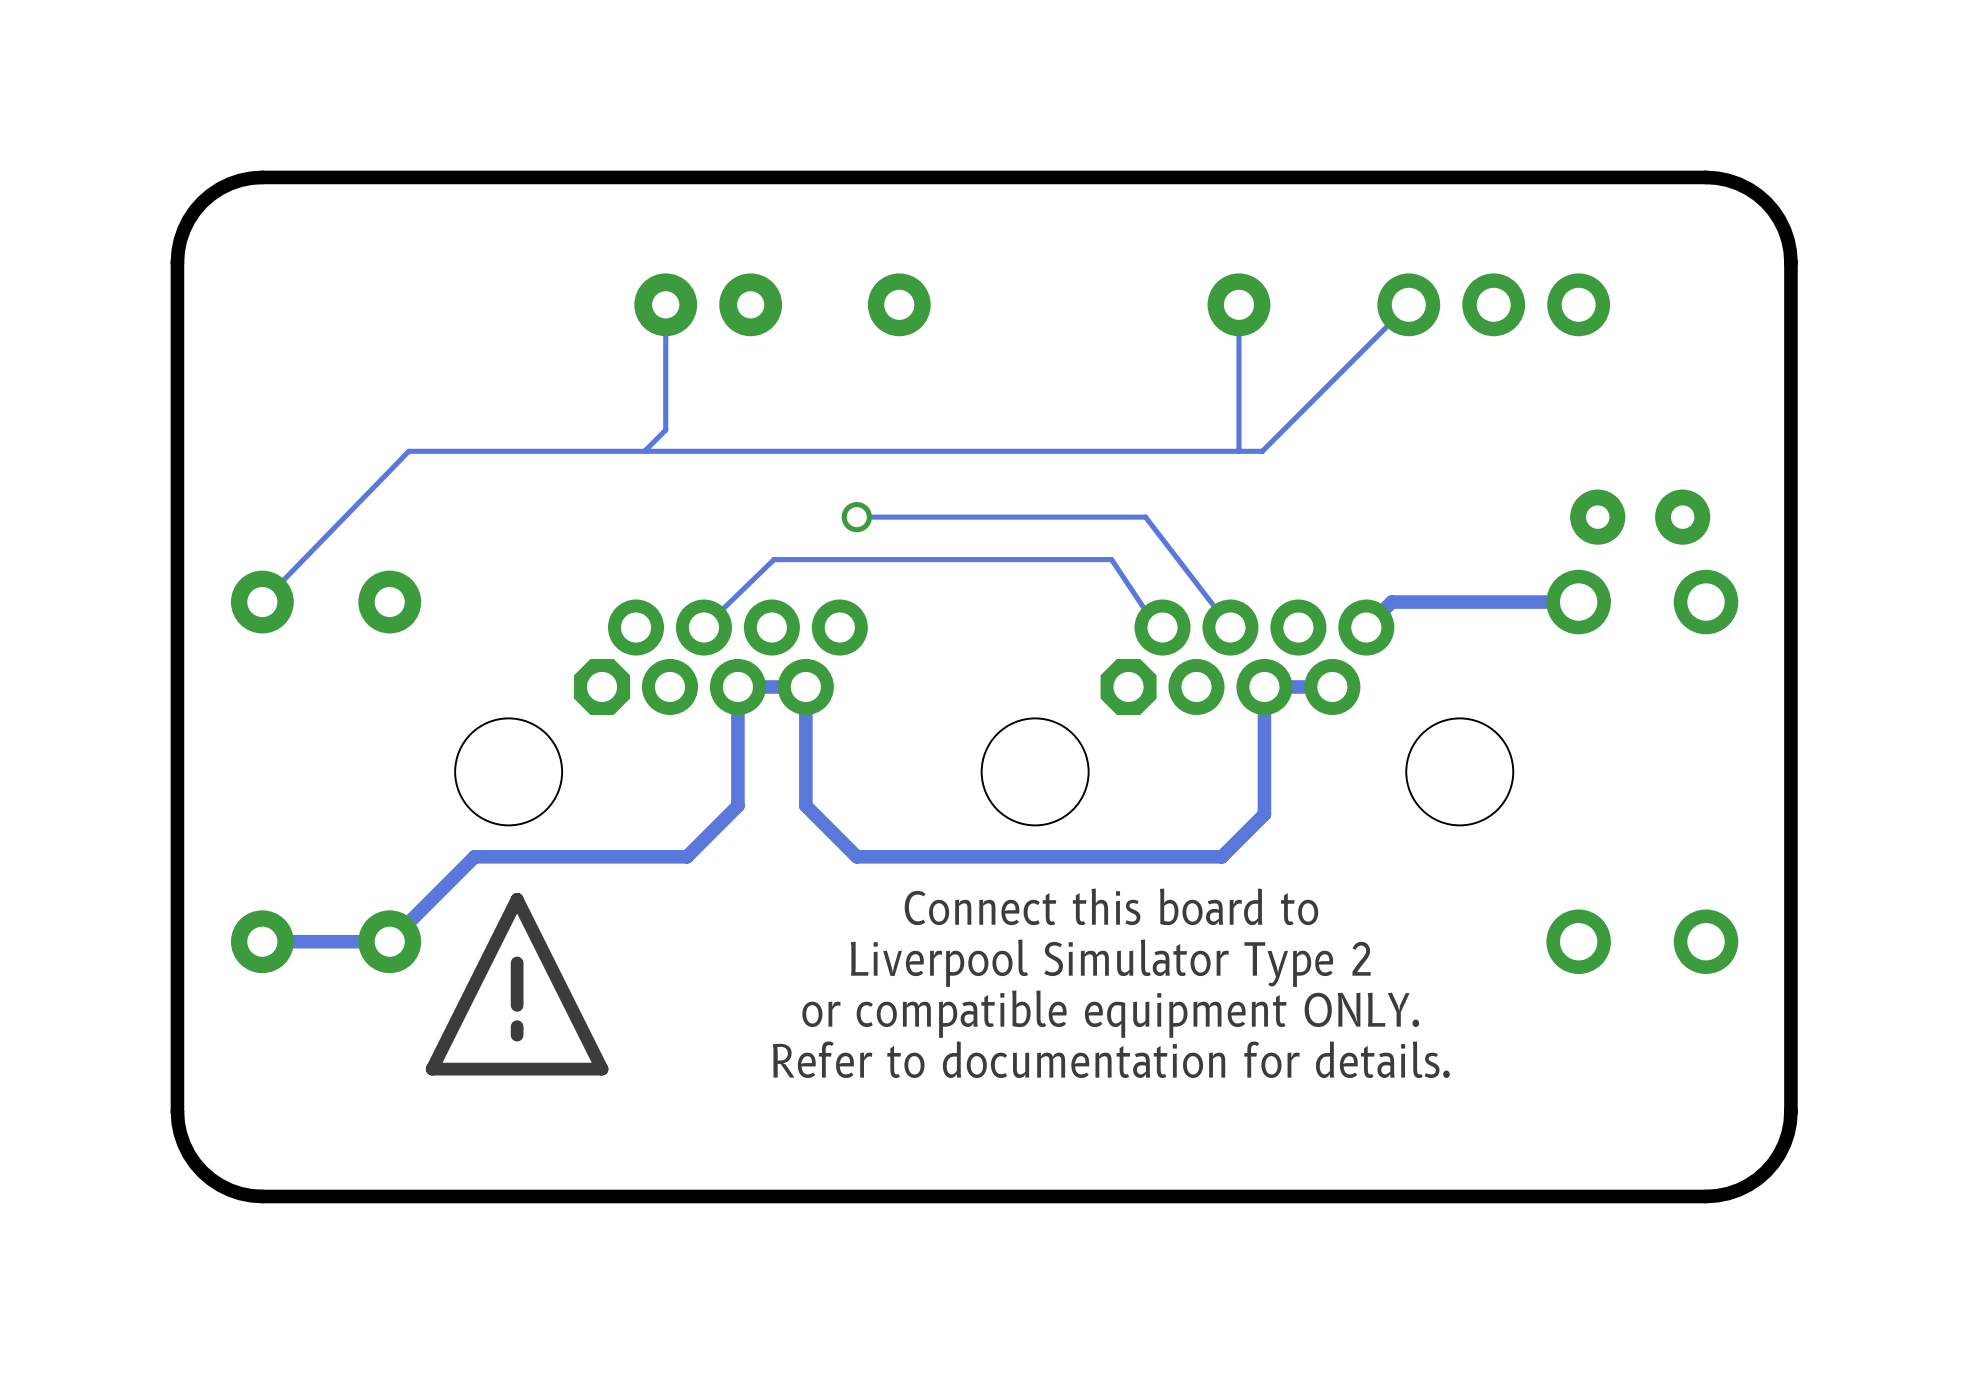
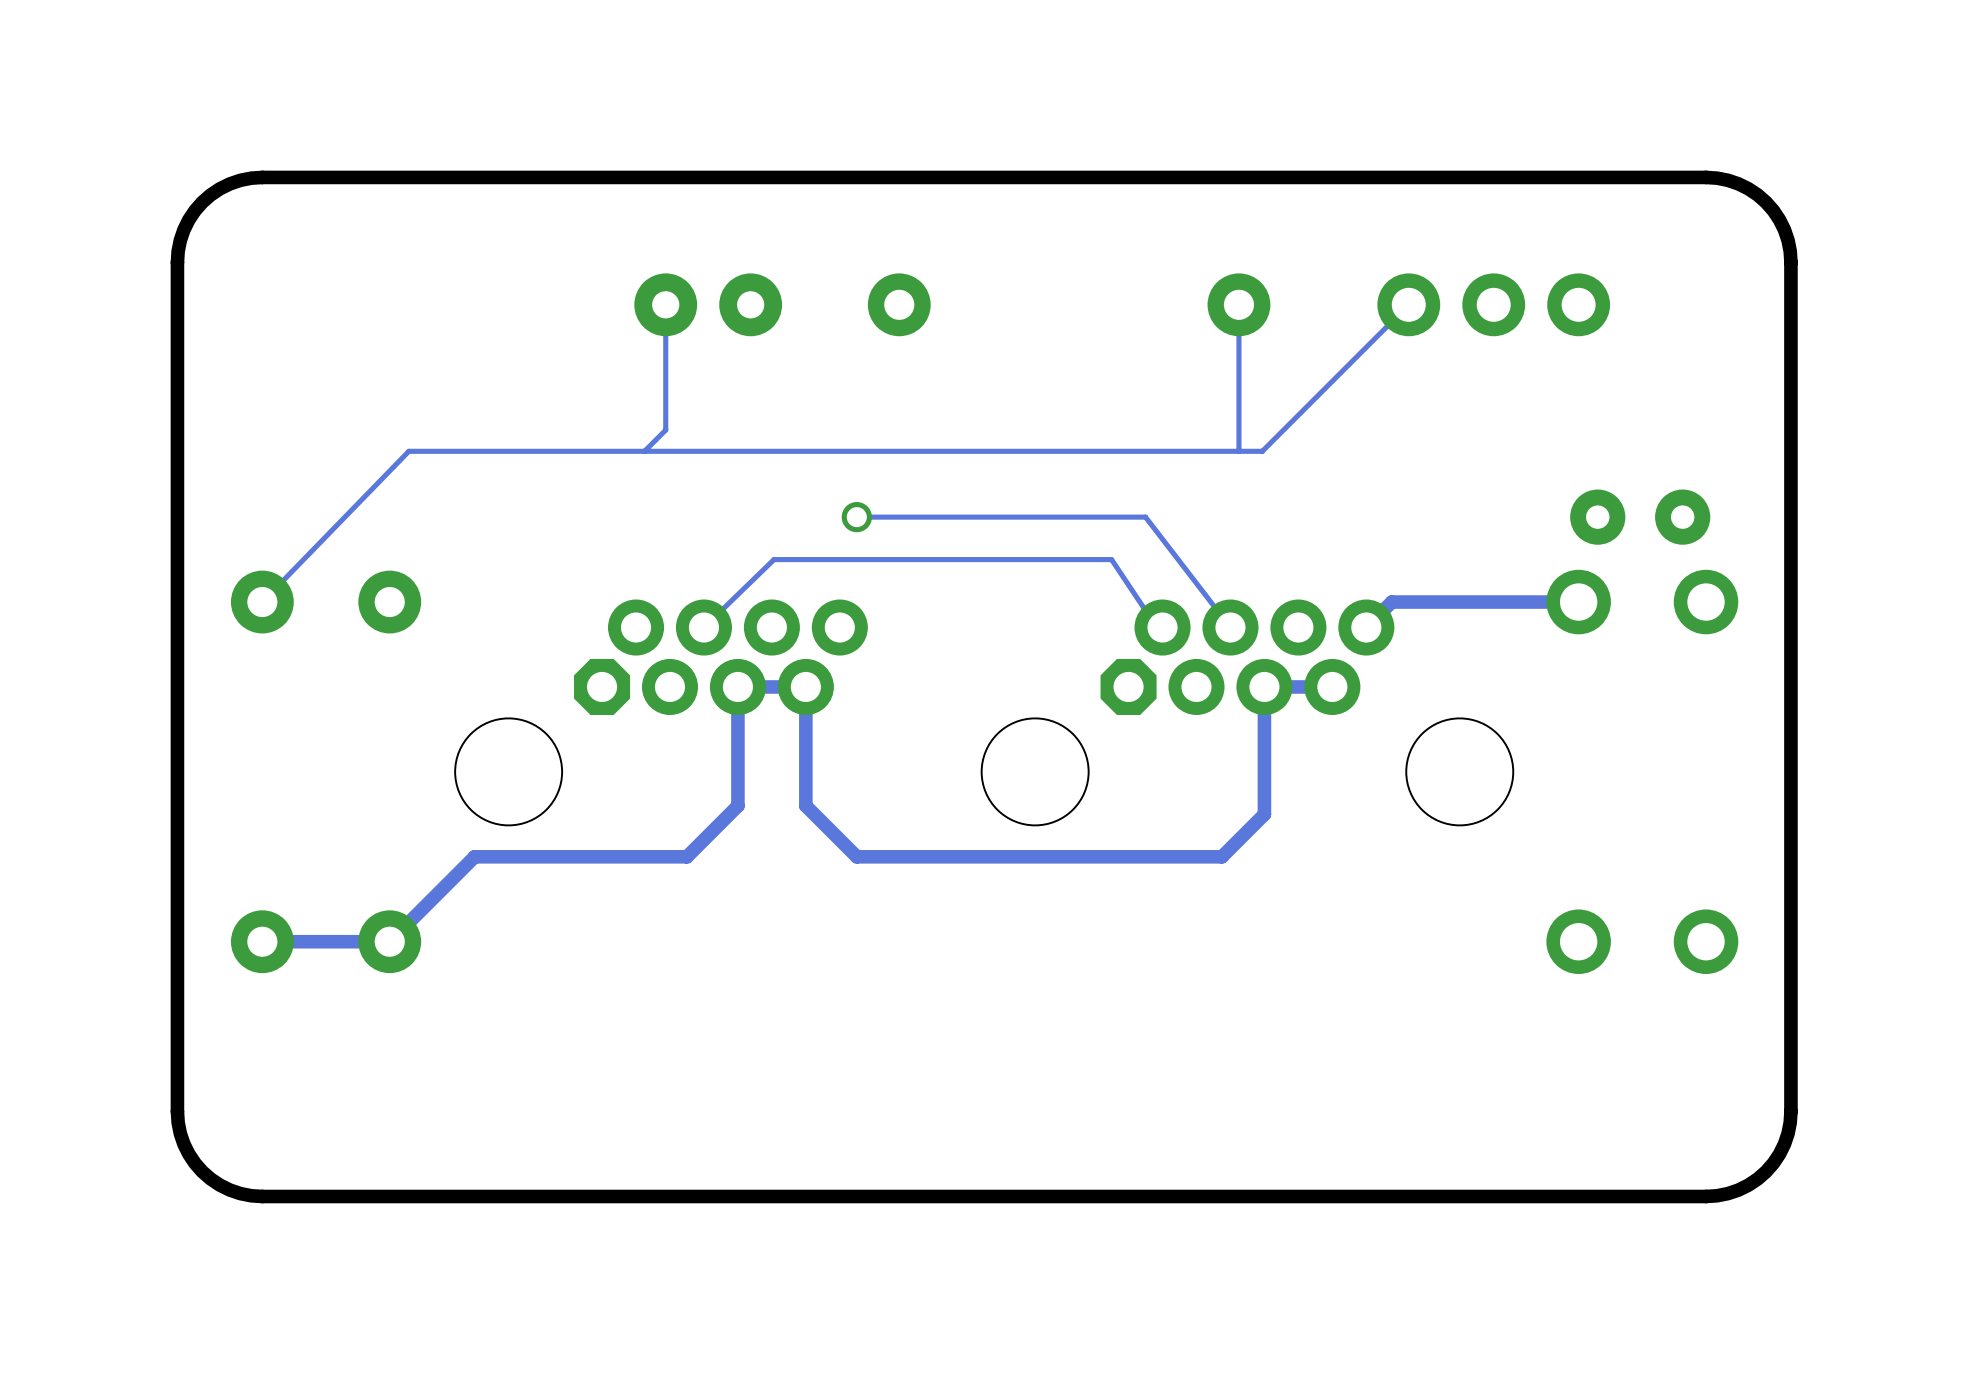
drawing: [425, 892, 609, 1076] -> none
text: Connect this board to (1111, 906) -> none
text: Liverpool Simulator Type 2 (1110, 963) -> none
text: or compatible equipment ONLY. (1110, 1014) -> none
text: Refer to documentation for details. (1111, 1059) -> none

